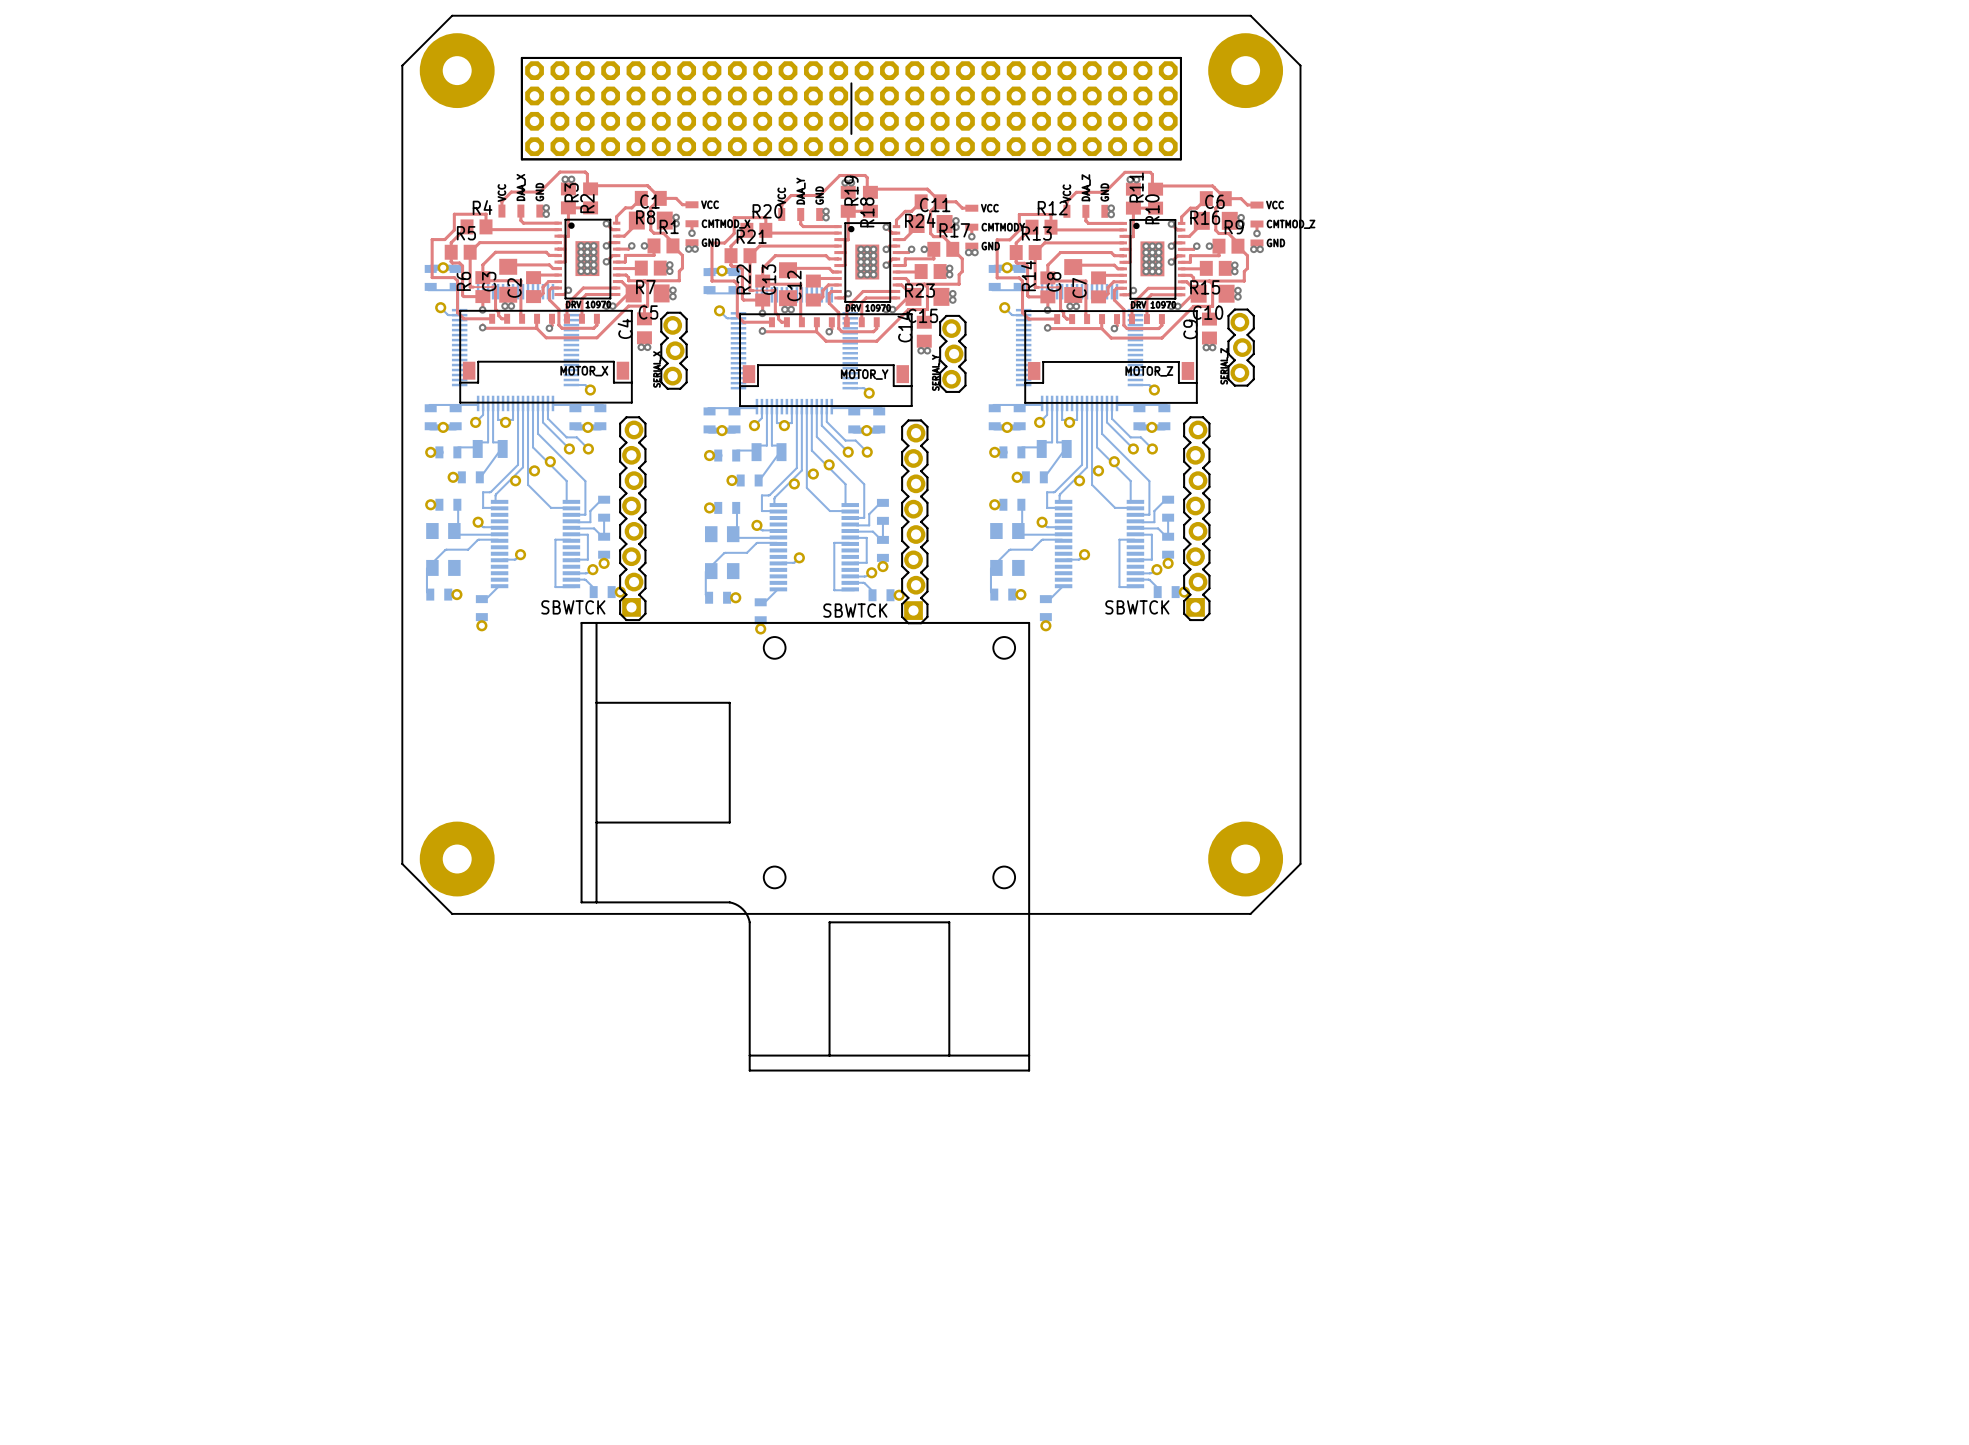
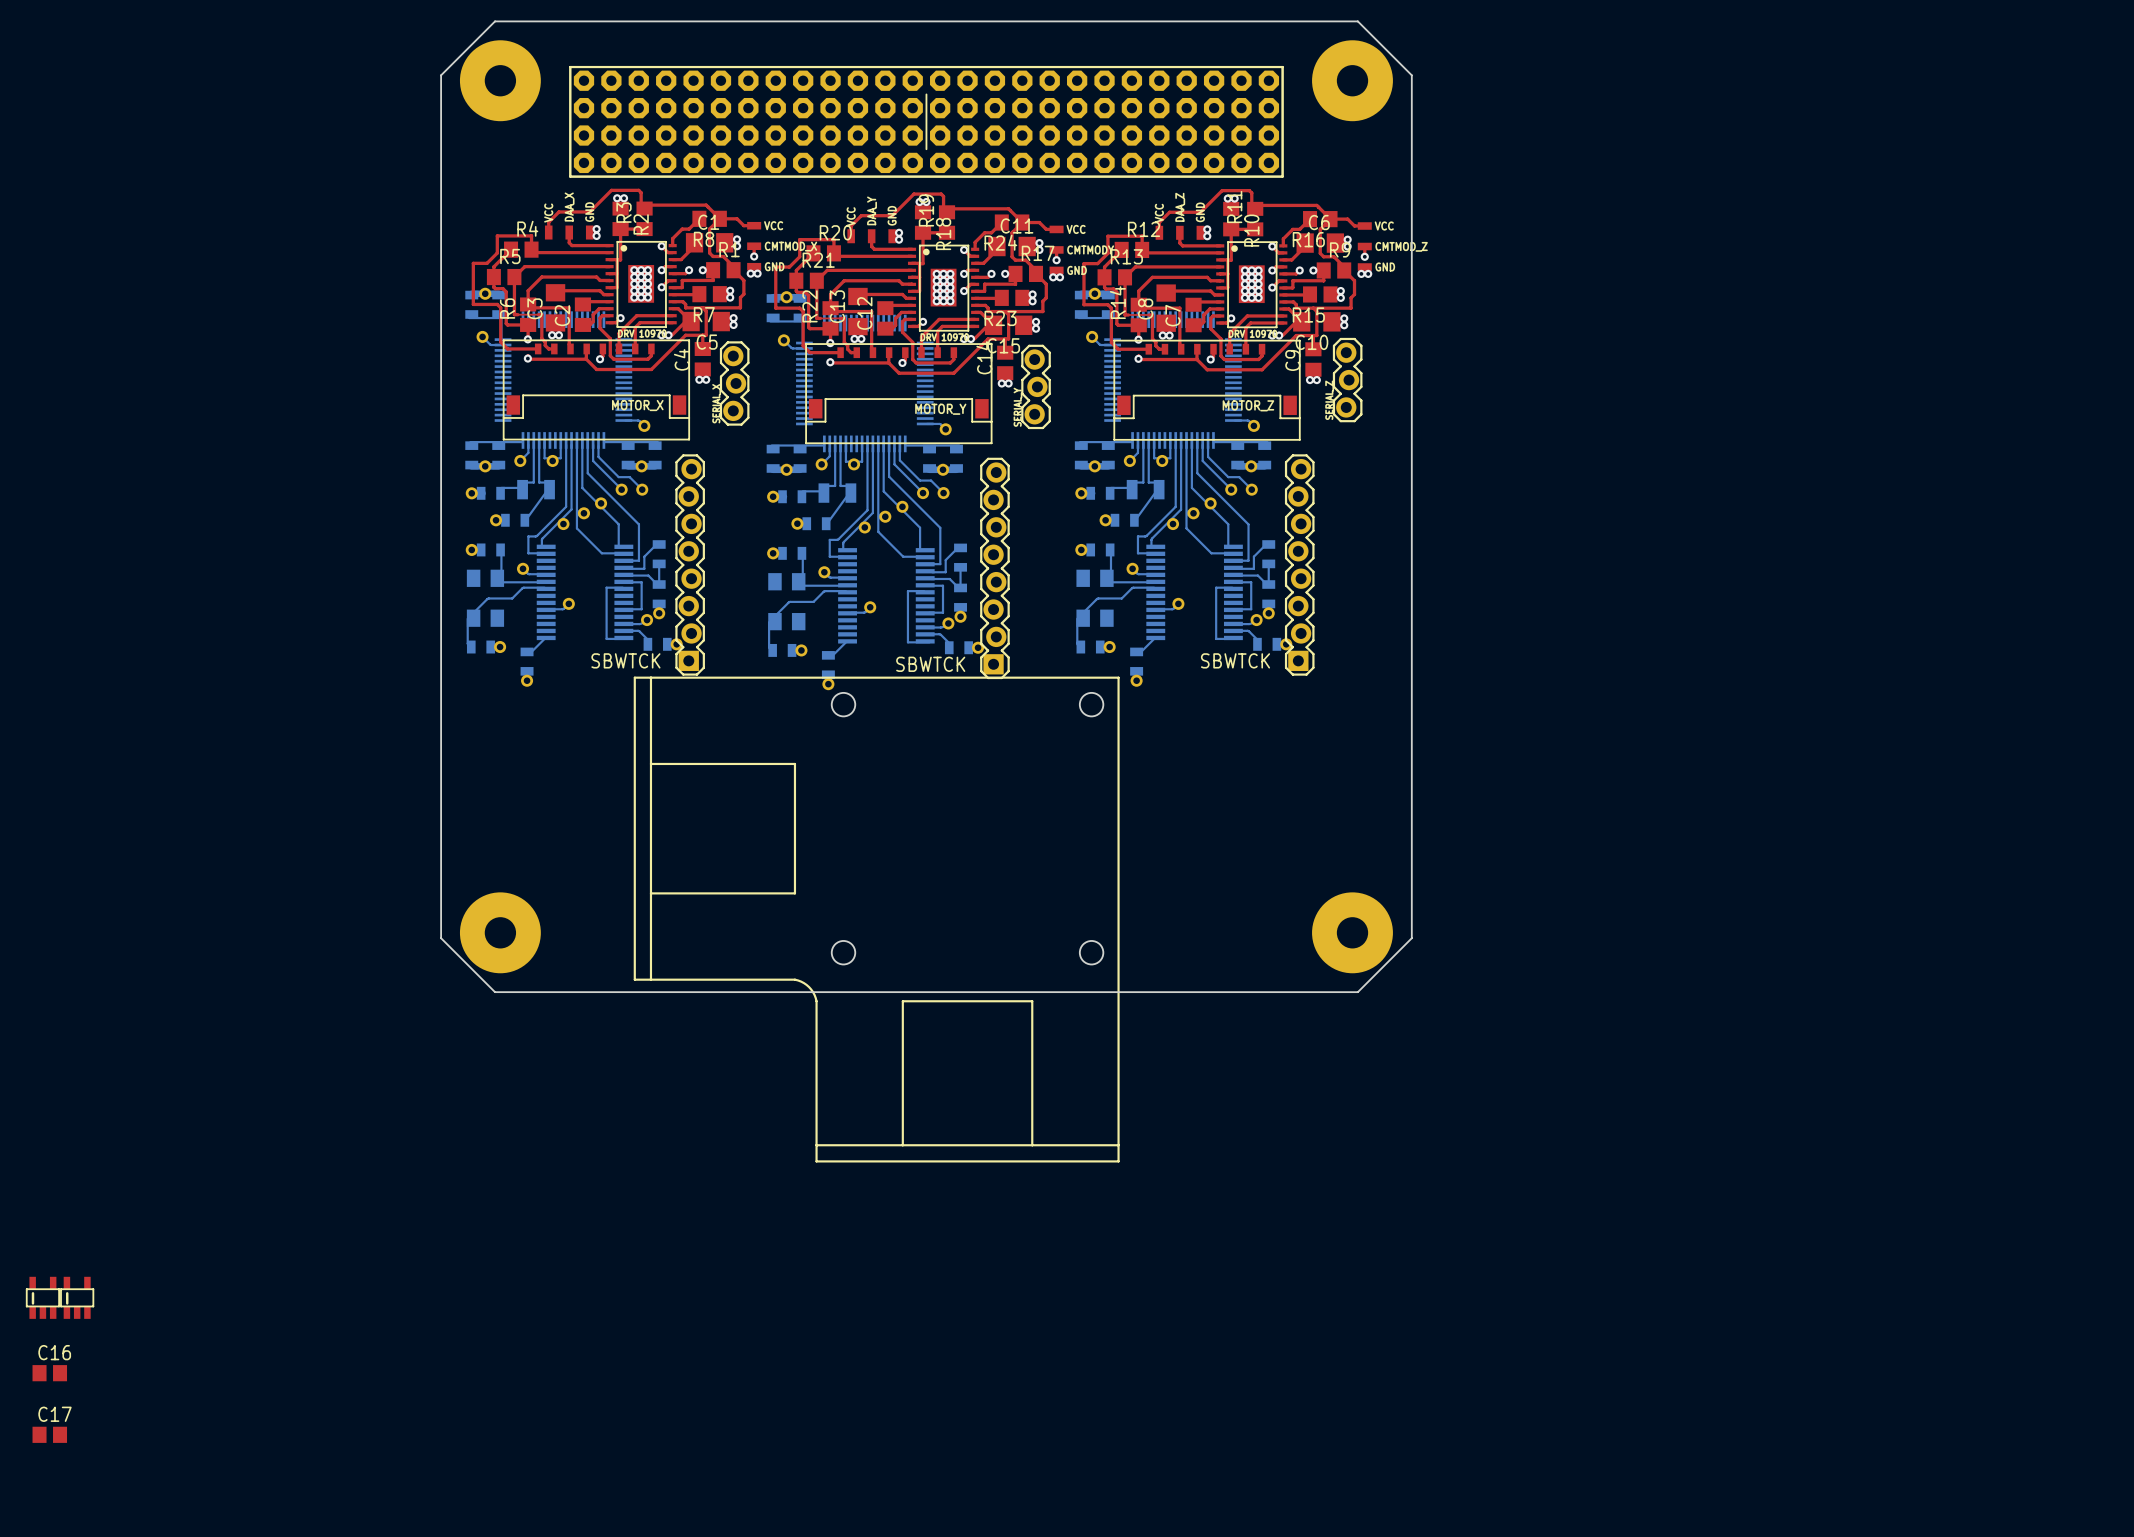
part: none -> (42, 1297)
part: none -> (77, 1297)
C16: none -> (49, 1373)
C17: none -> (49, 1434)

